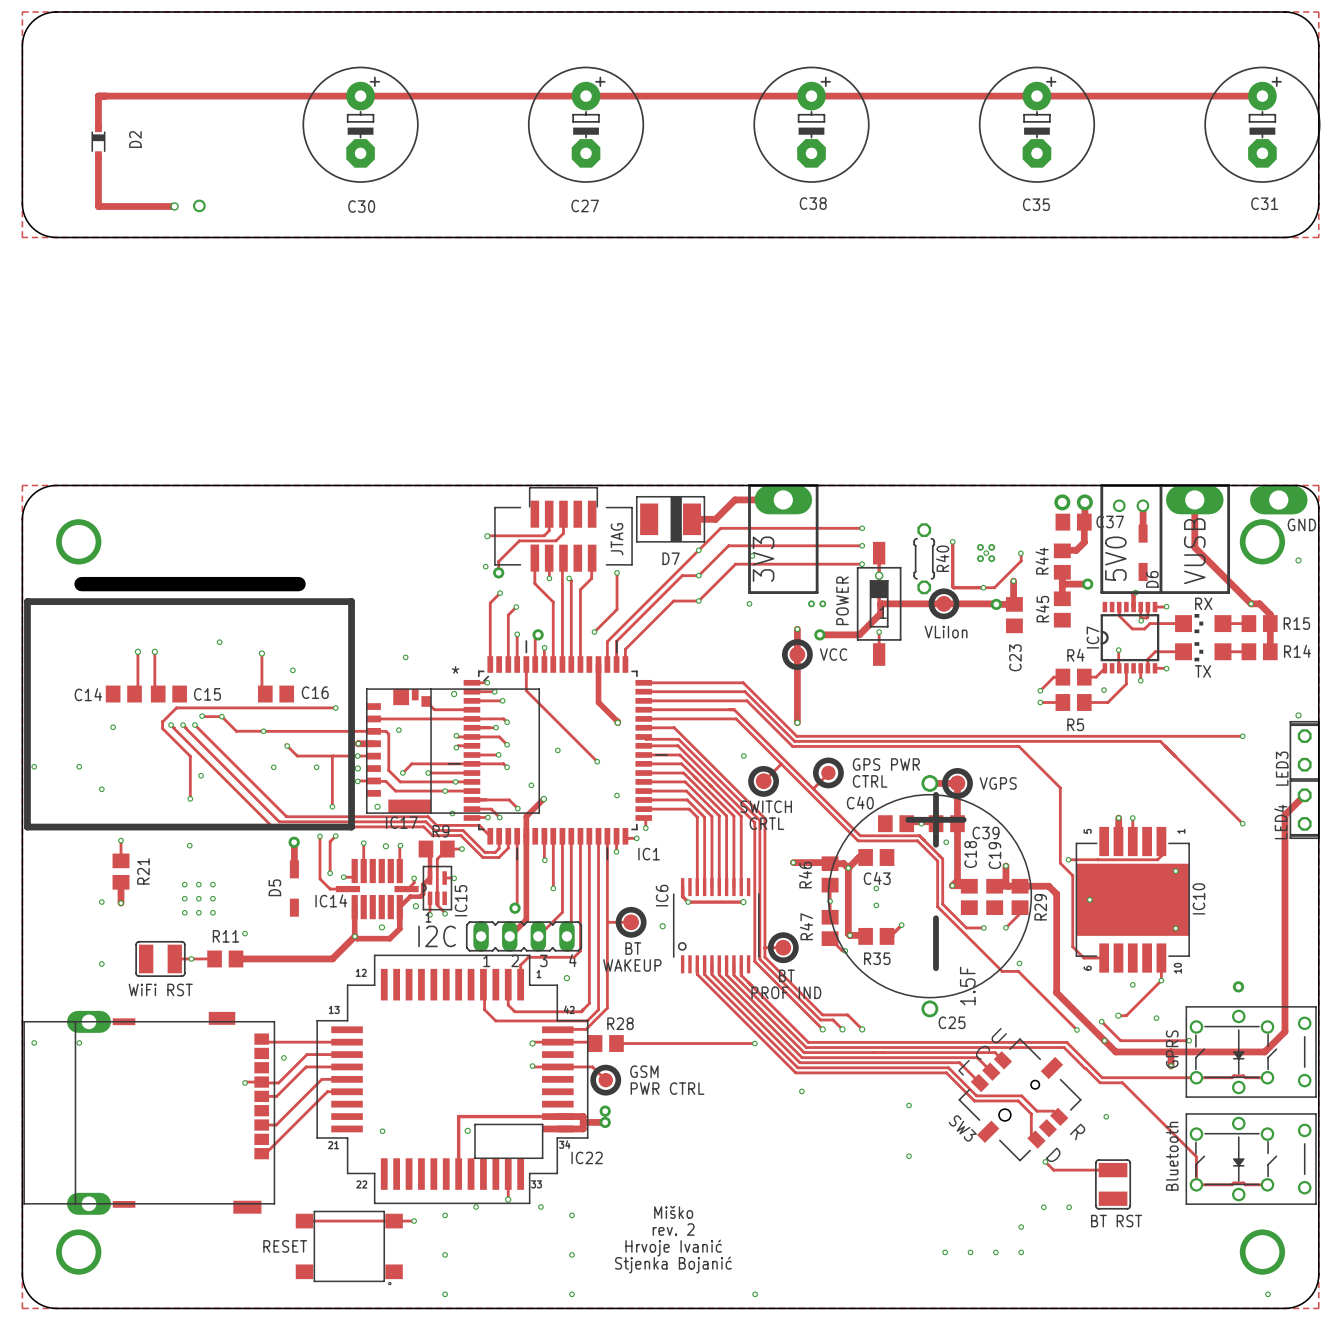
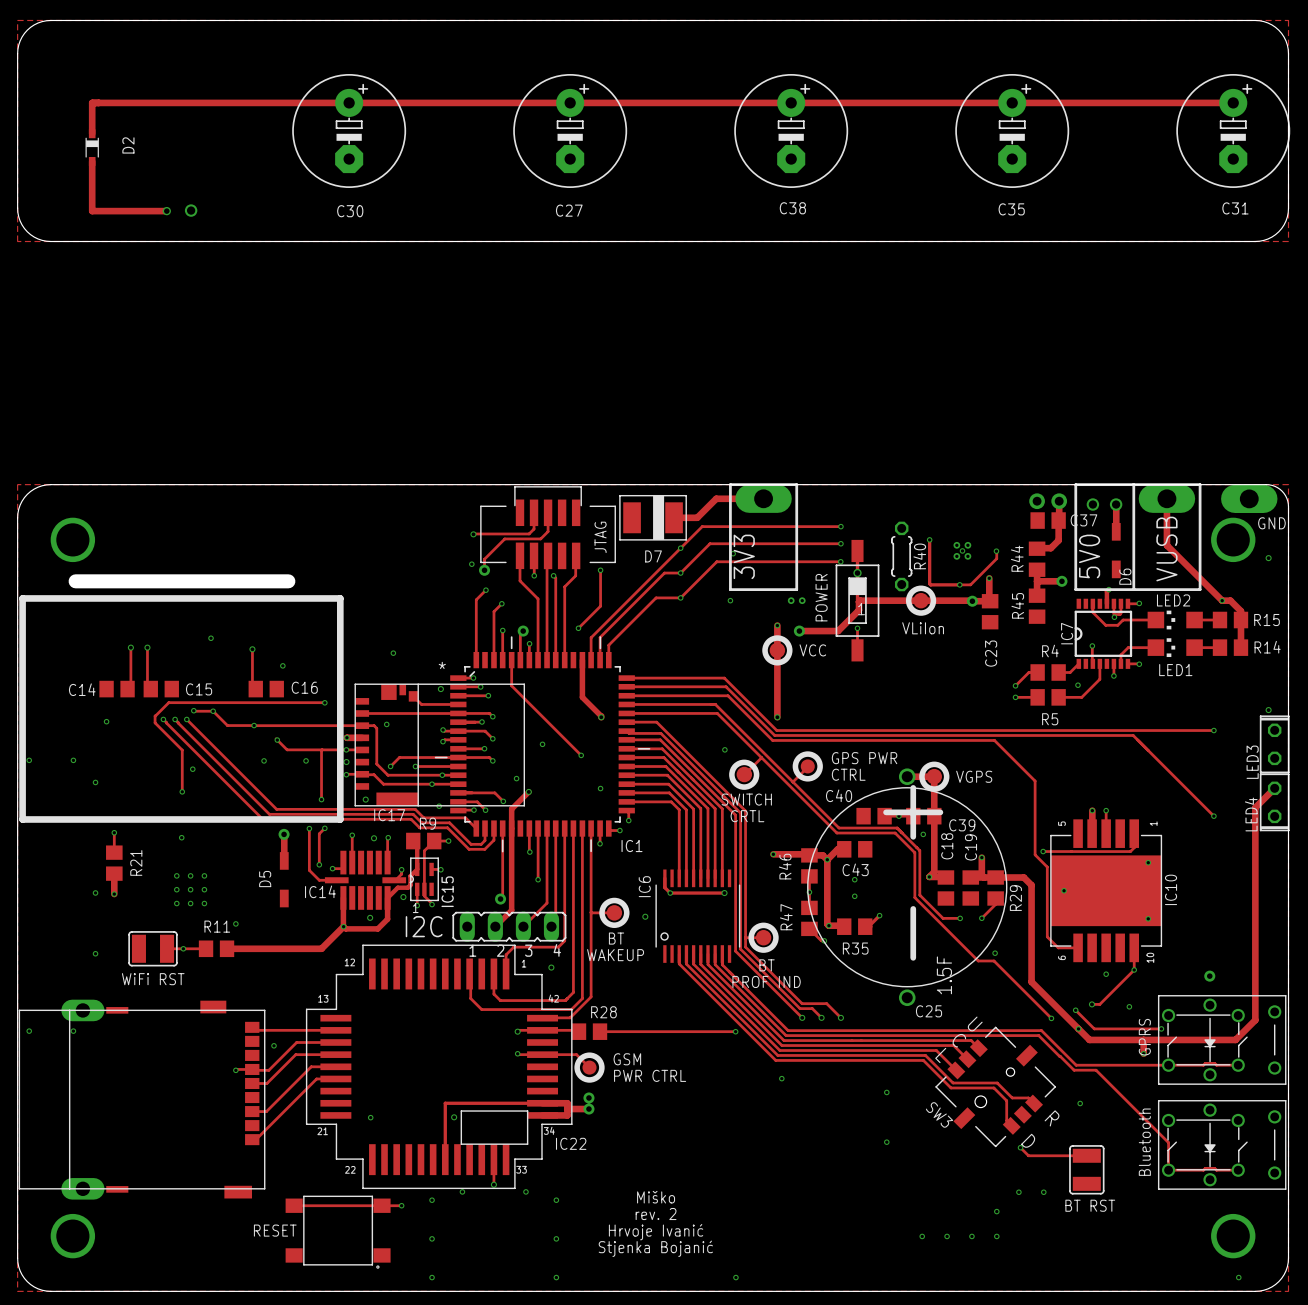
LED2 name: none -> LED2 (1173, 600)
text: RX (1203, 603) -> none
text: TX (1203, 671) -> none
LED1 name: none -> LED1 (1175, 670)

